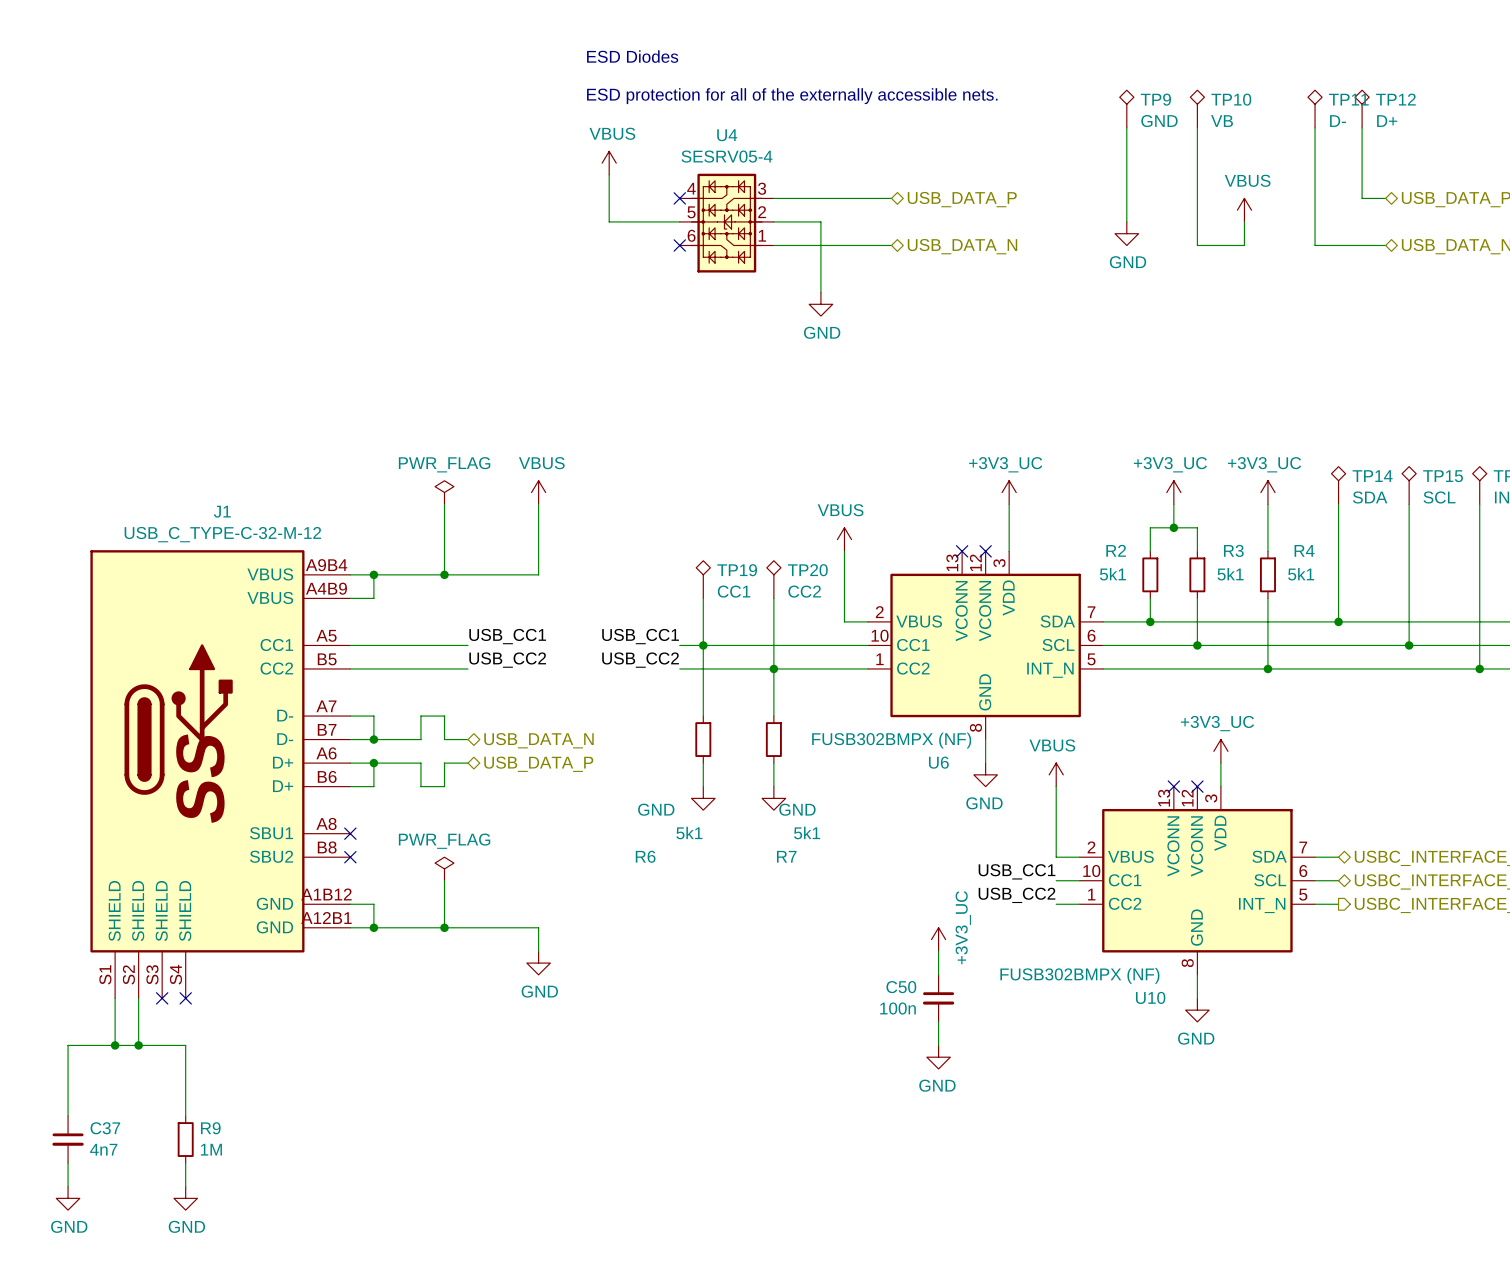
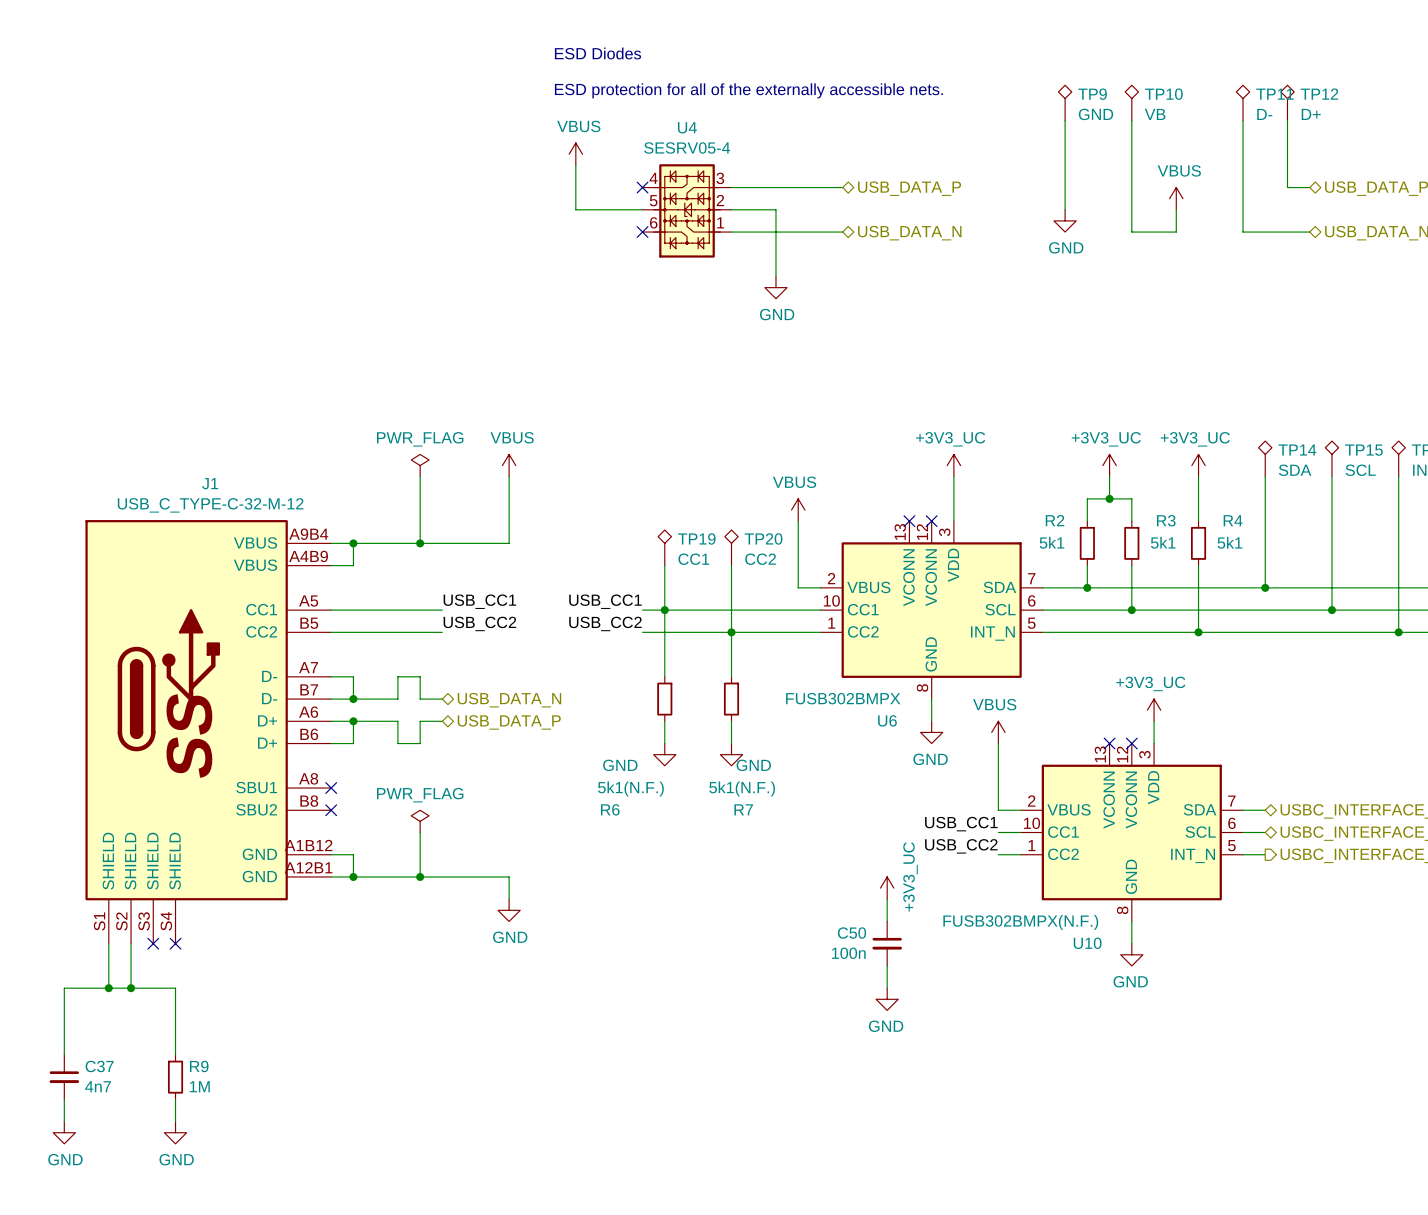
U6 value: FUSB302BMPX (NF) (891, 740) -> FUSB302BMPX (843, 698)
R6 value: 5k1 (689, 833) -> 5k1(N.F.) (630, 788)
R7 value: 5k1 (807, 833) -> 5k1(N.F.) (742, 788)
U10 value: FUSB302BMPX (NF) (1079, 975) -> FUSB302BMPX(N.F.) (1020, 922)

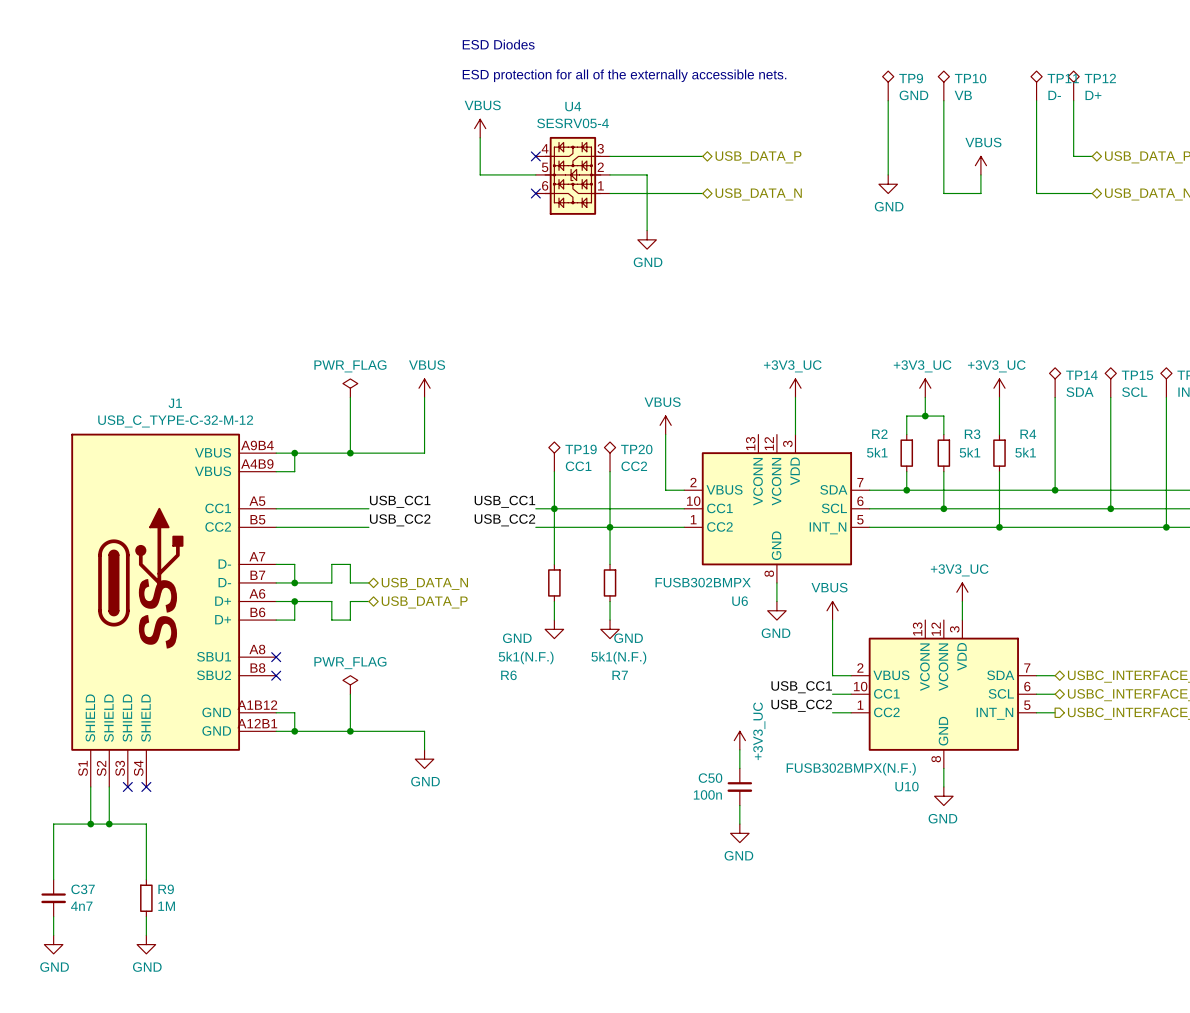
no-connect mark: (909, 521) -> none
no-connect mark: (931, 521) -> none
no-connect mark: (1109, 743) -> none
no-connect mark: (1131, 743) -> none

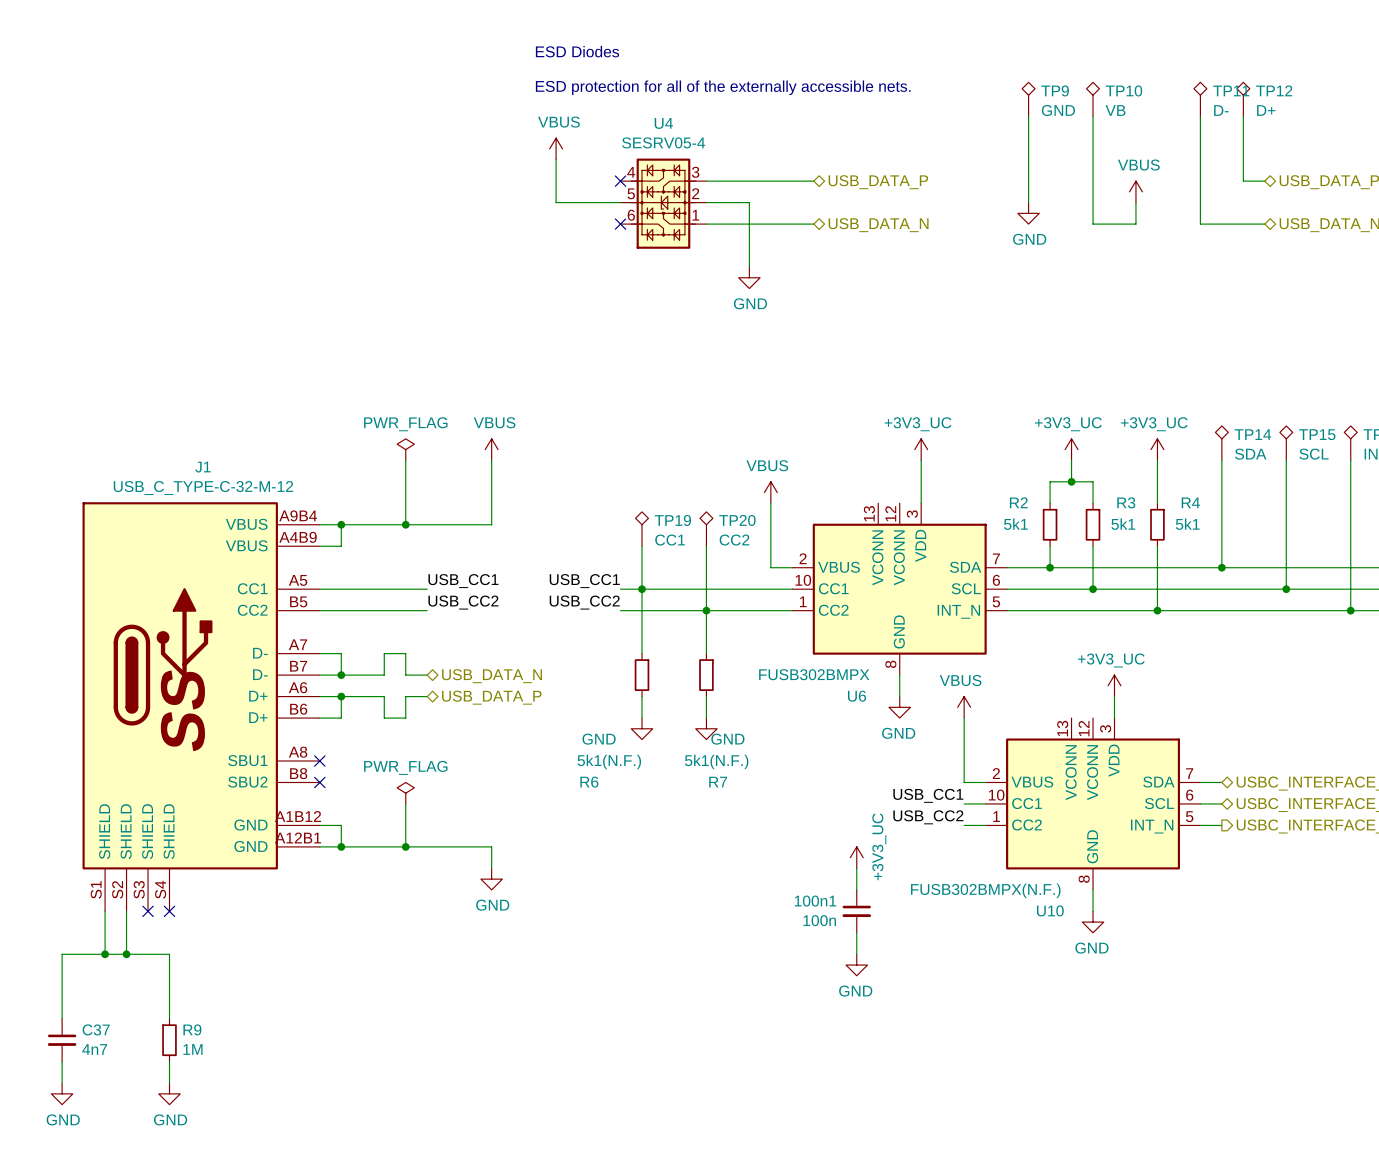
C50 name: C50 (710, 778) -> 100n1 (815, 901)

